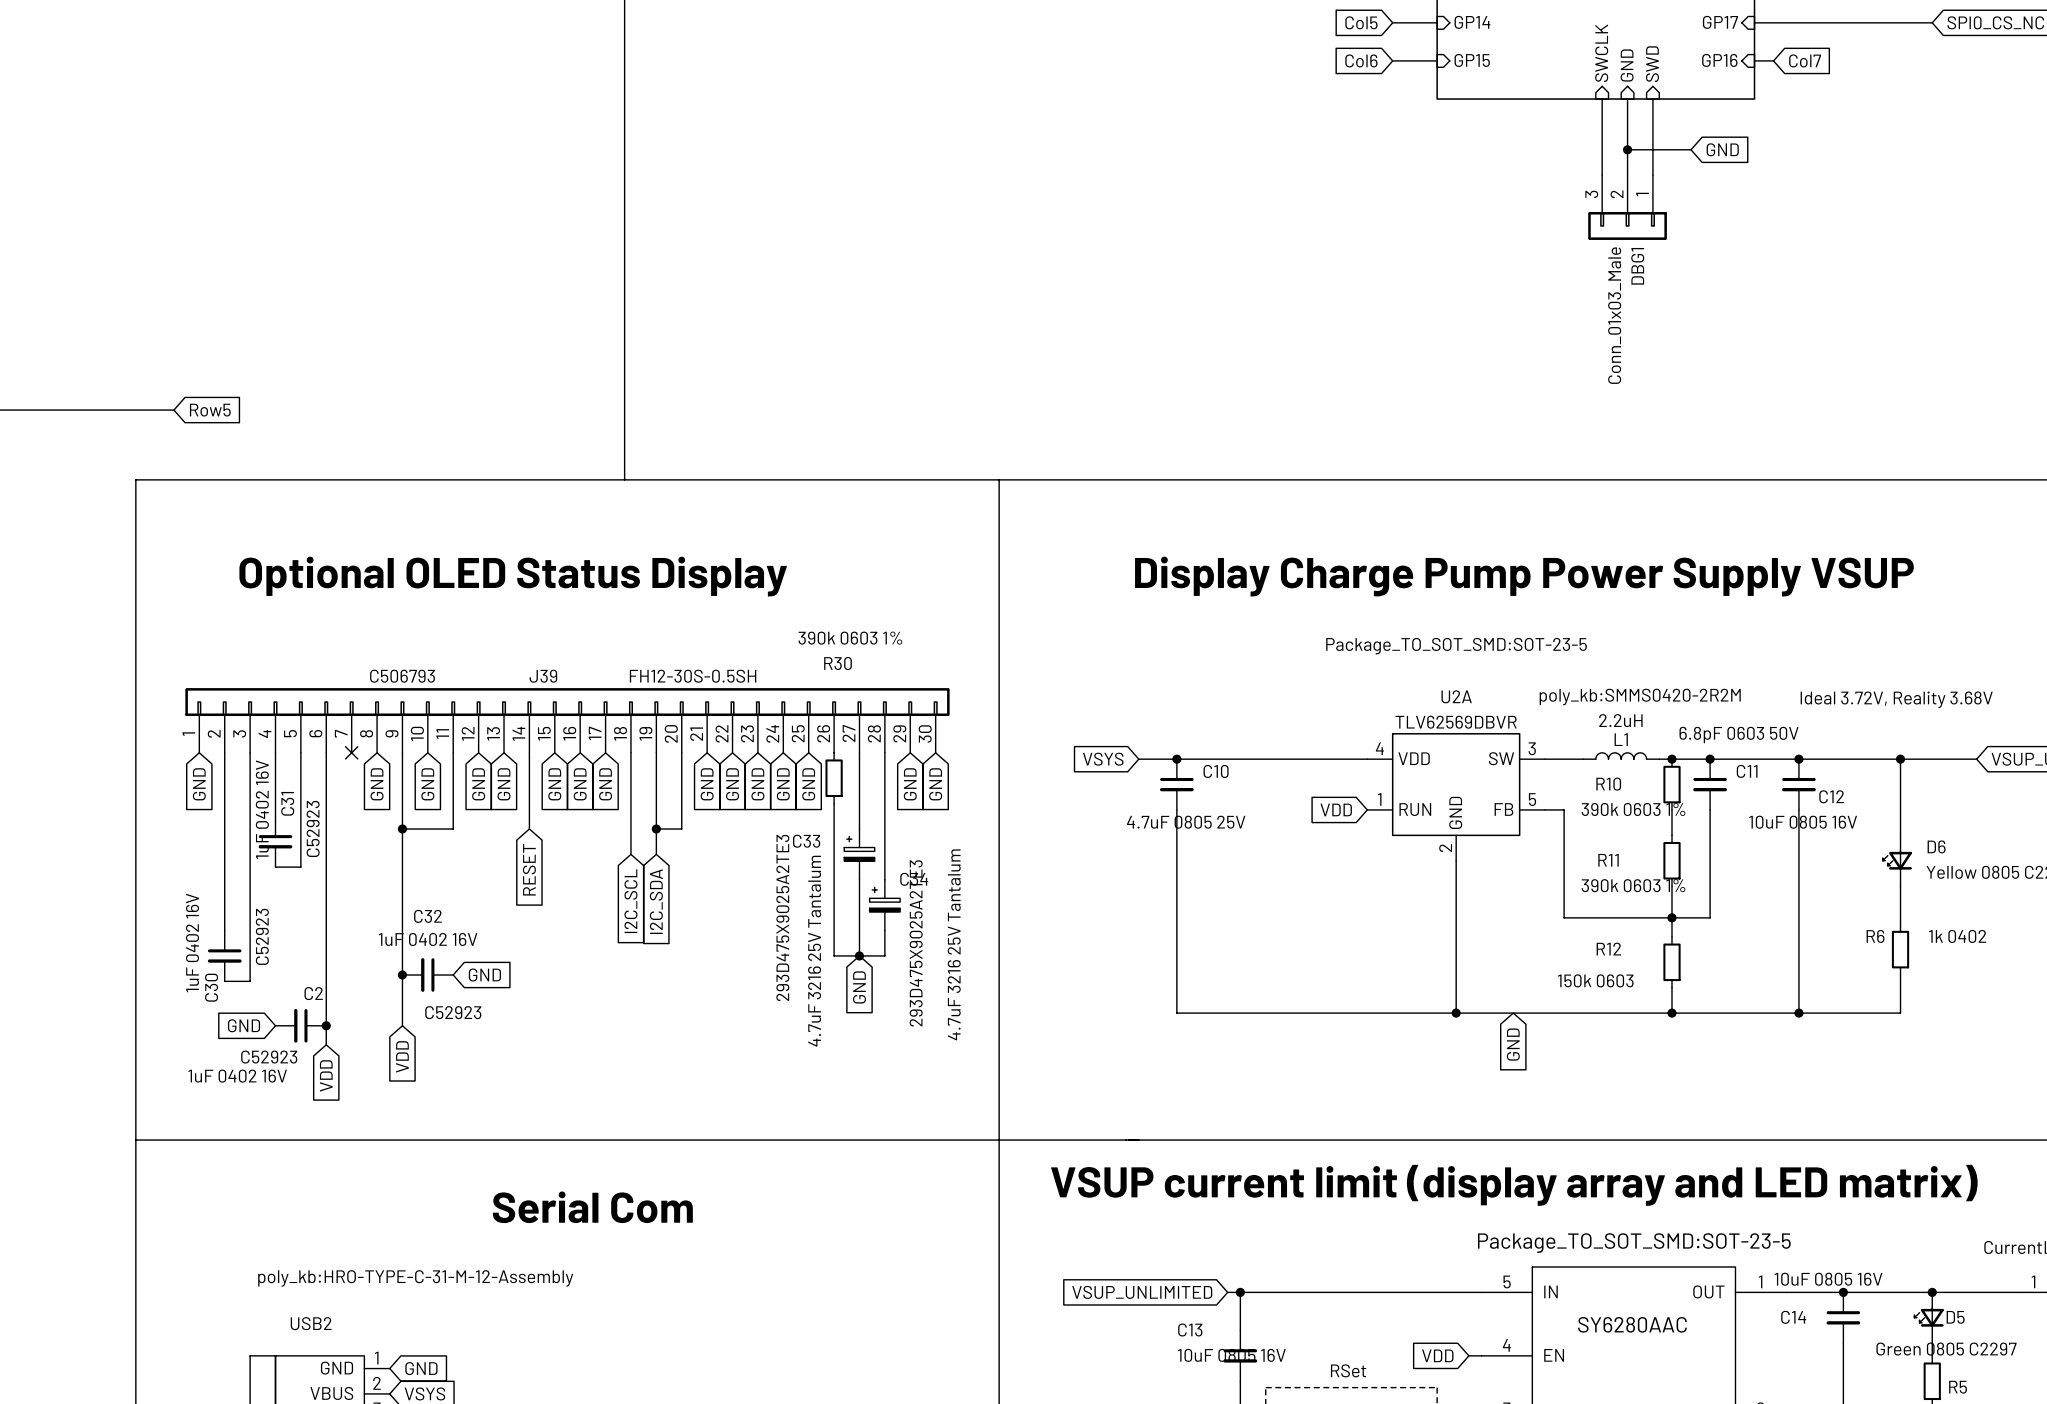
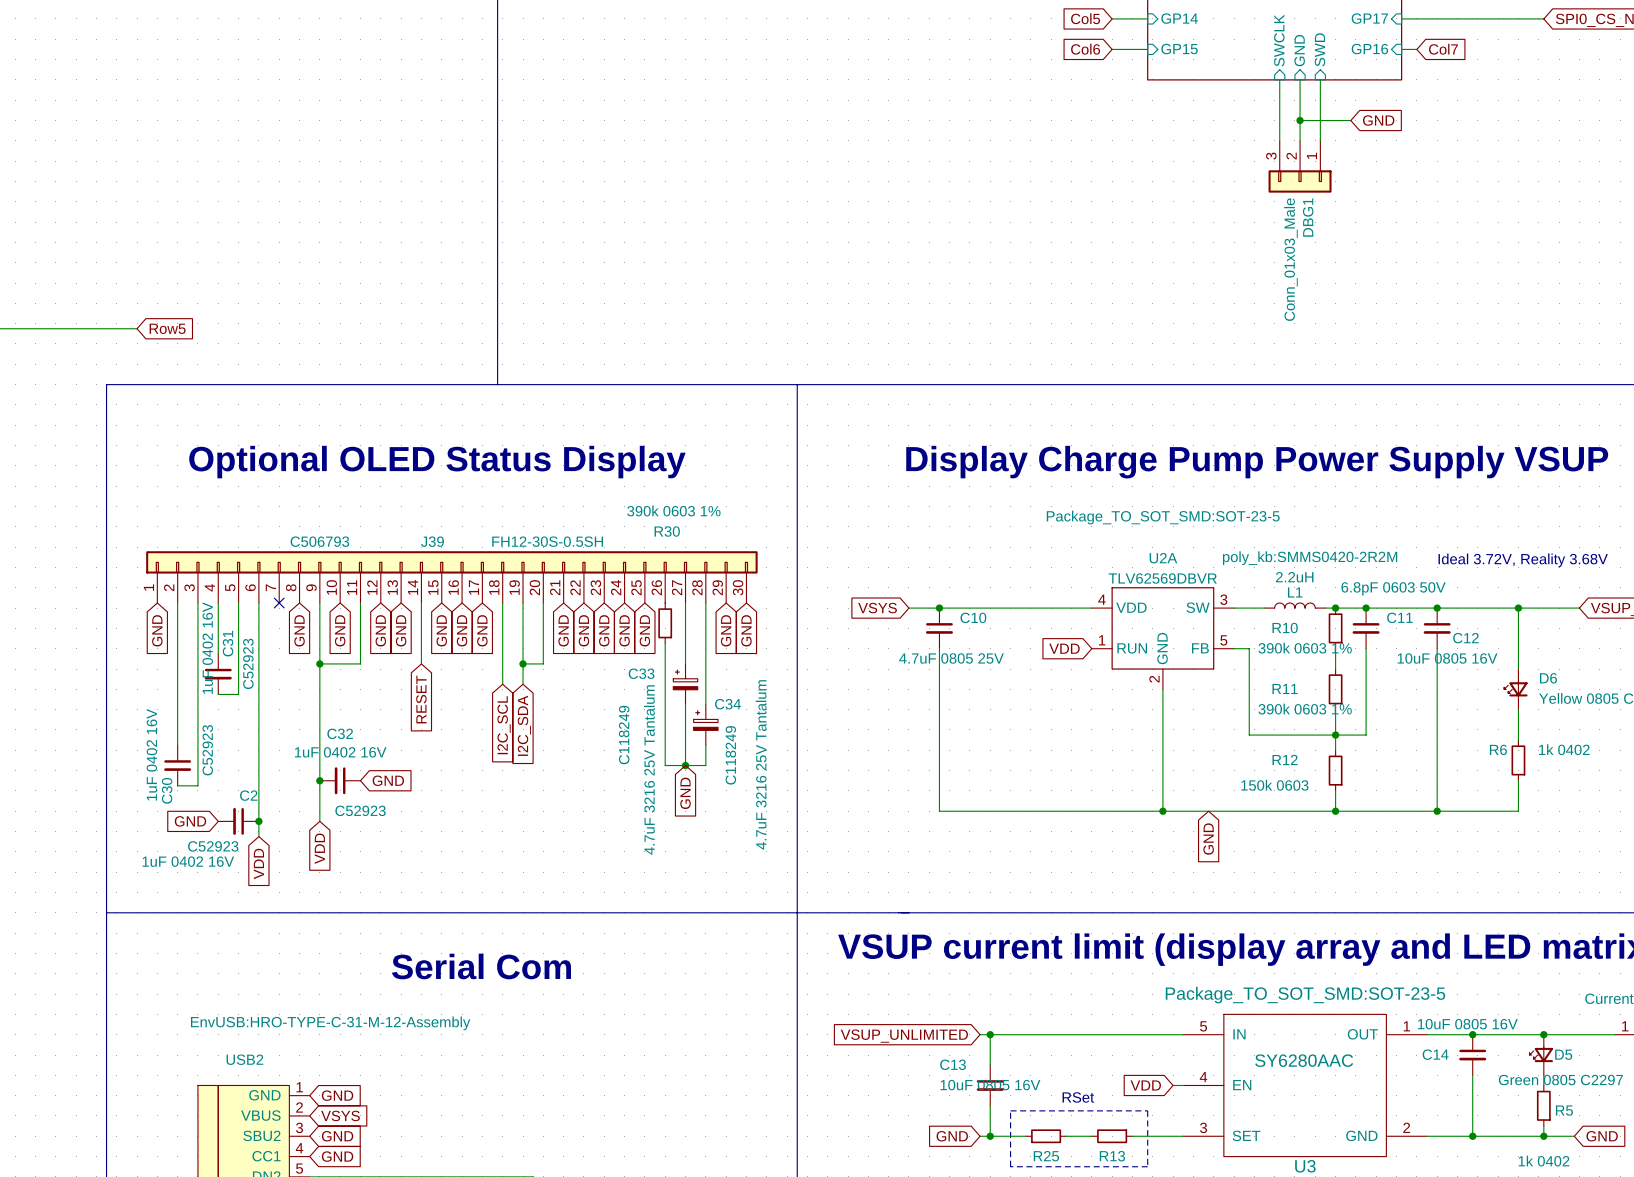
C33 text: 293D475X9025A2TE3 (782, 917) -> C118249 (624, 735)
C34 text: 293D475X9025A2TE3 (916, 943) -> C118249 (730, 755)
USB2 text: poly_kb:HRO-TYPE-C-31-M-12-Assembly (415, 1278) -> EnvUSB:HRO-TYPE-C-31-M-12-Assembly (330, 1023)

